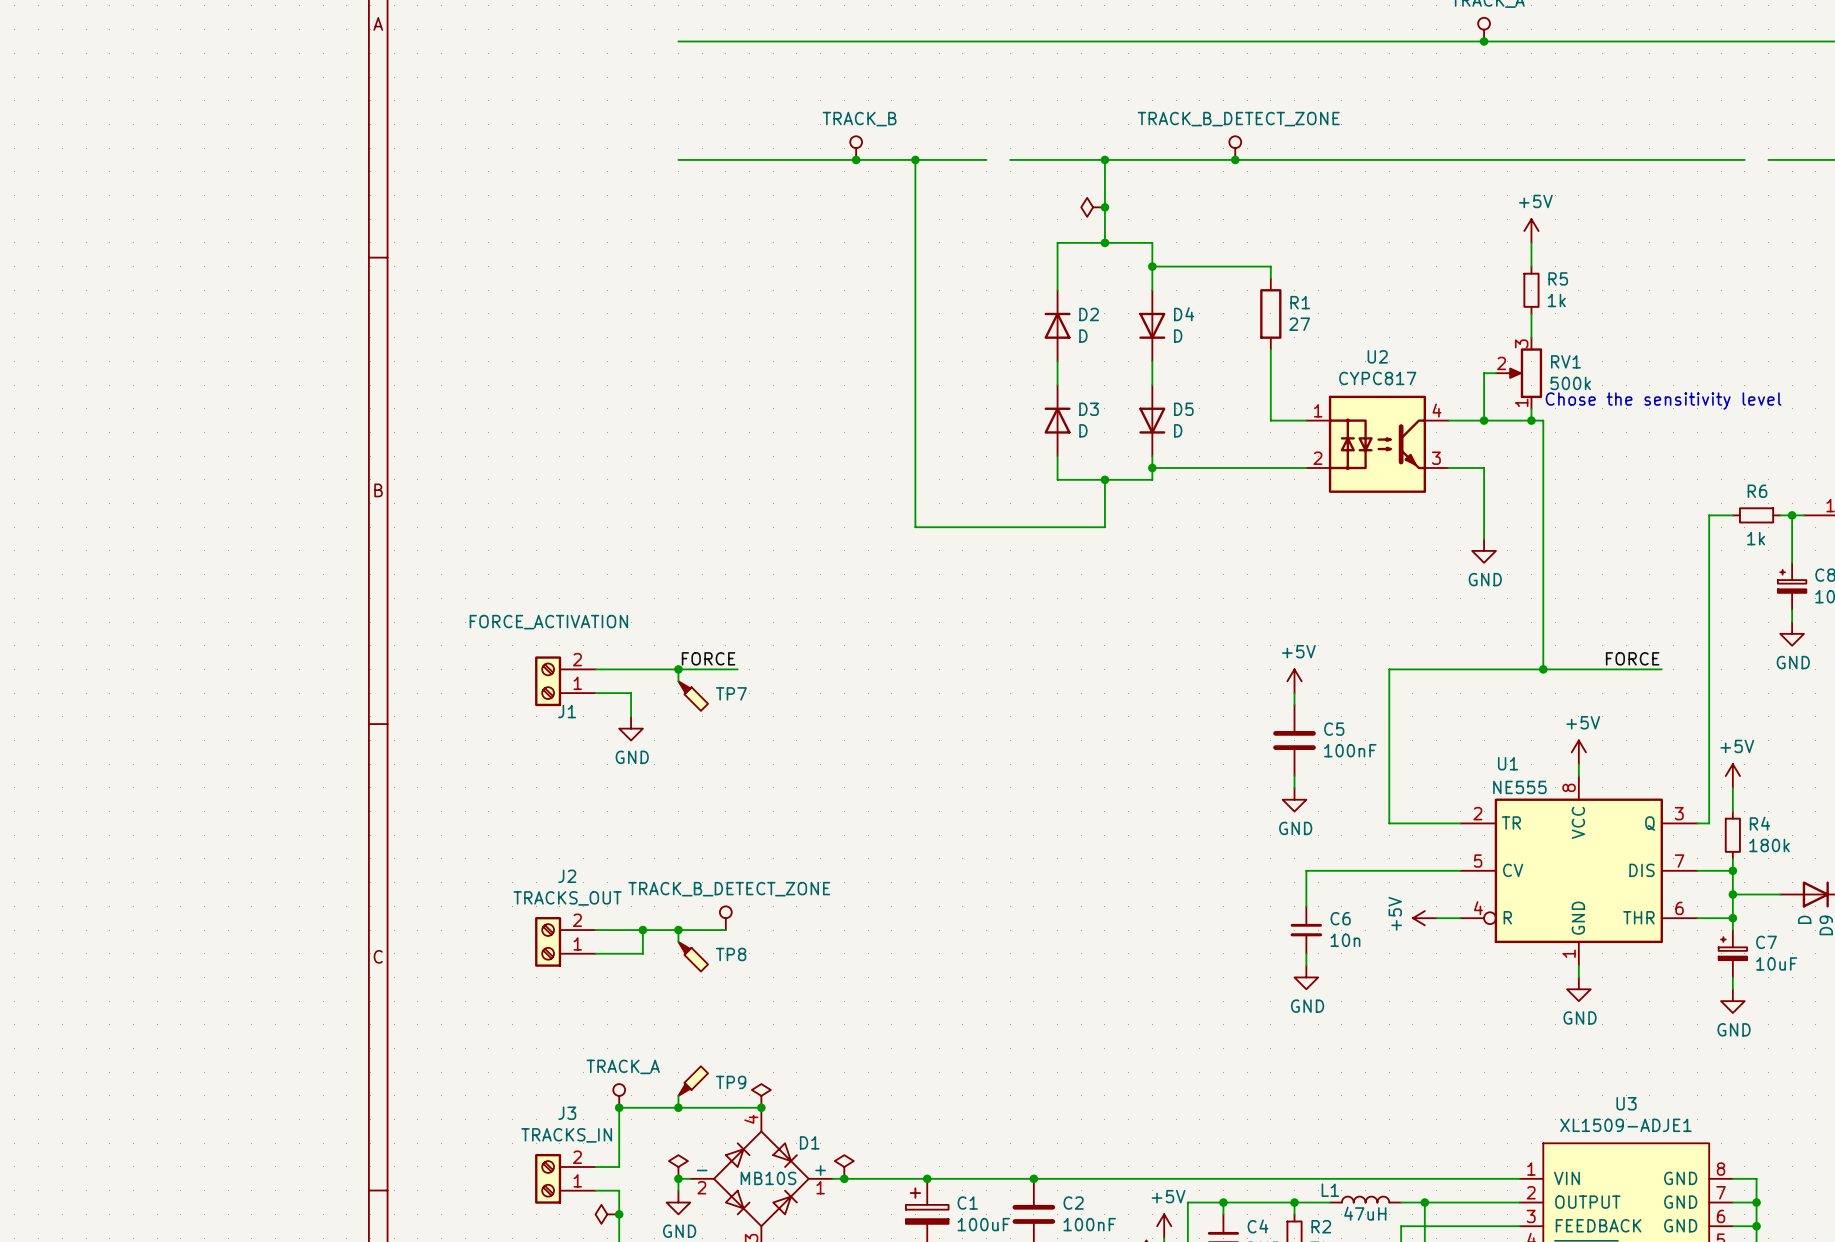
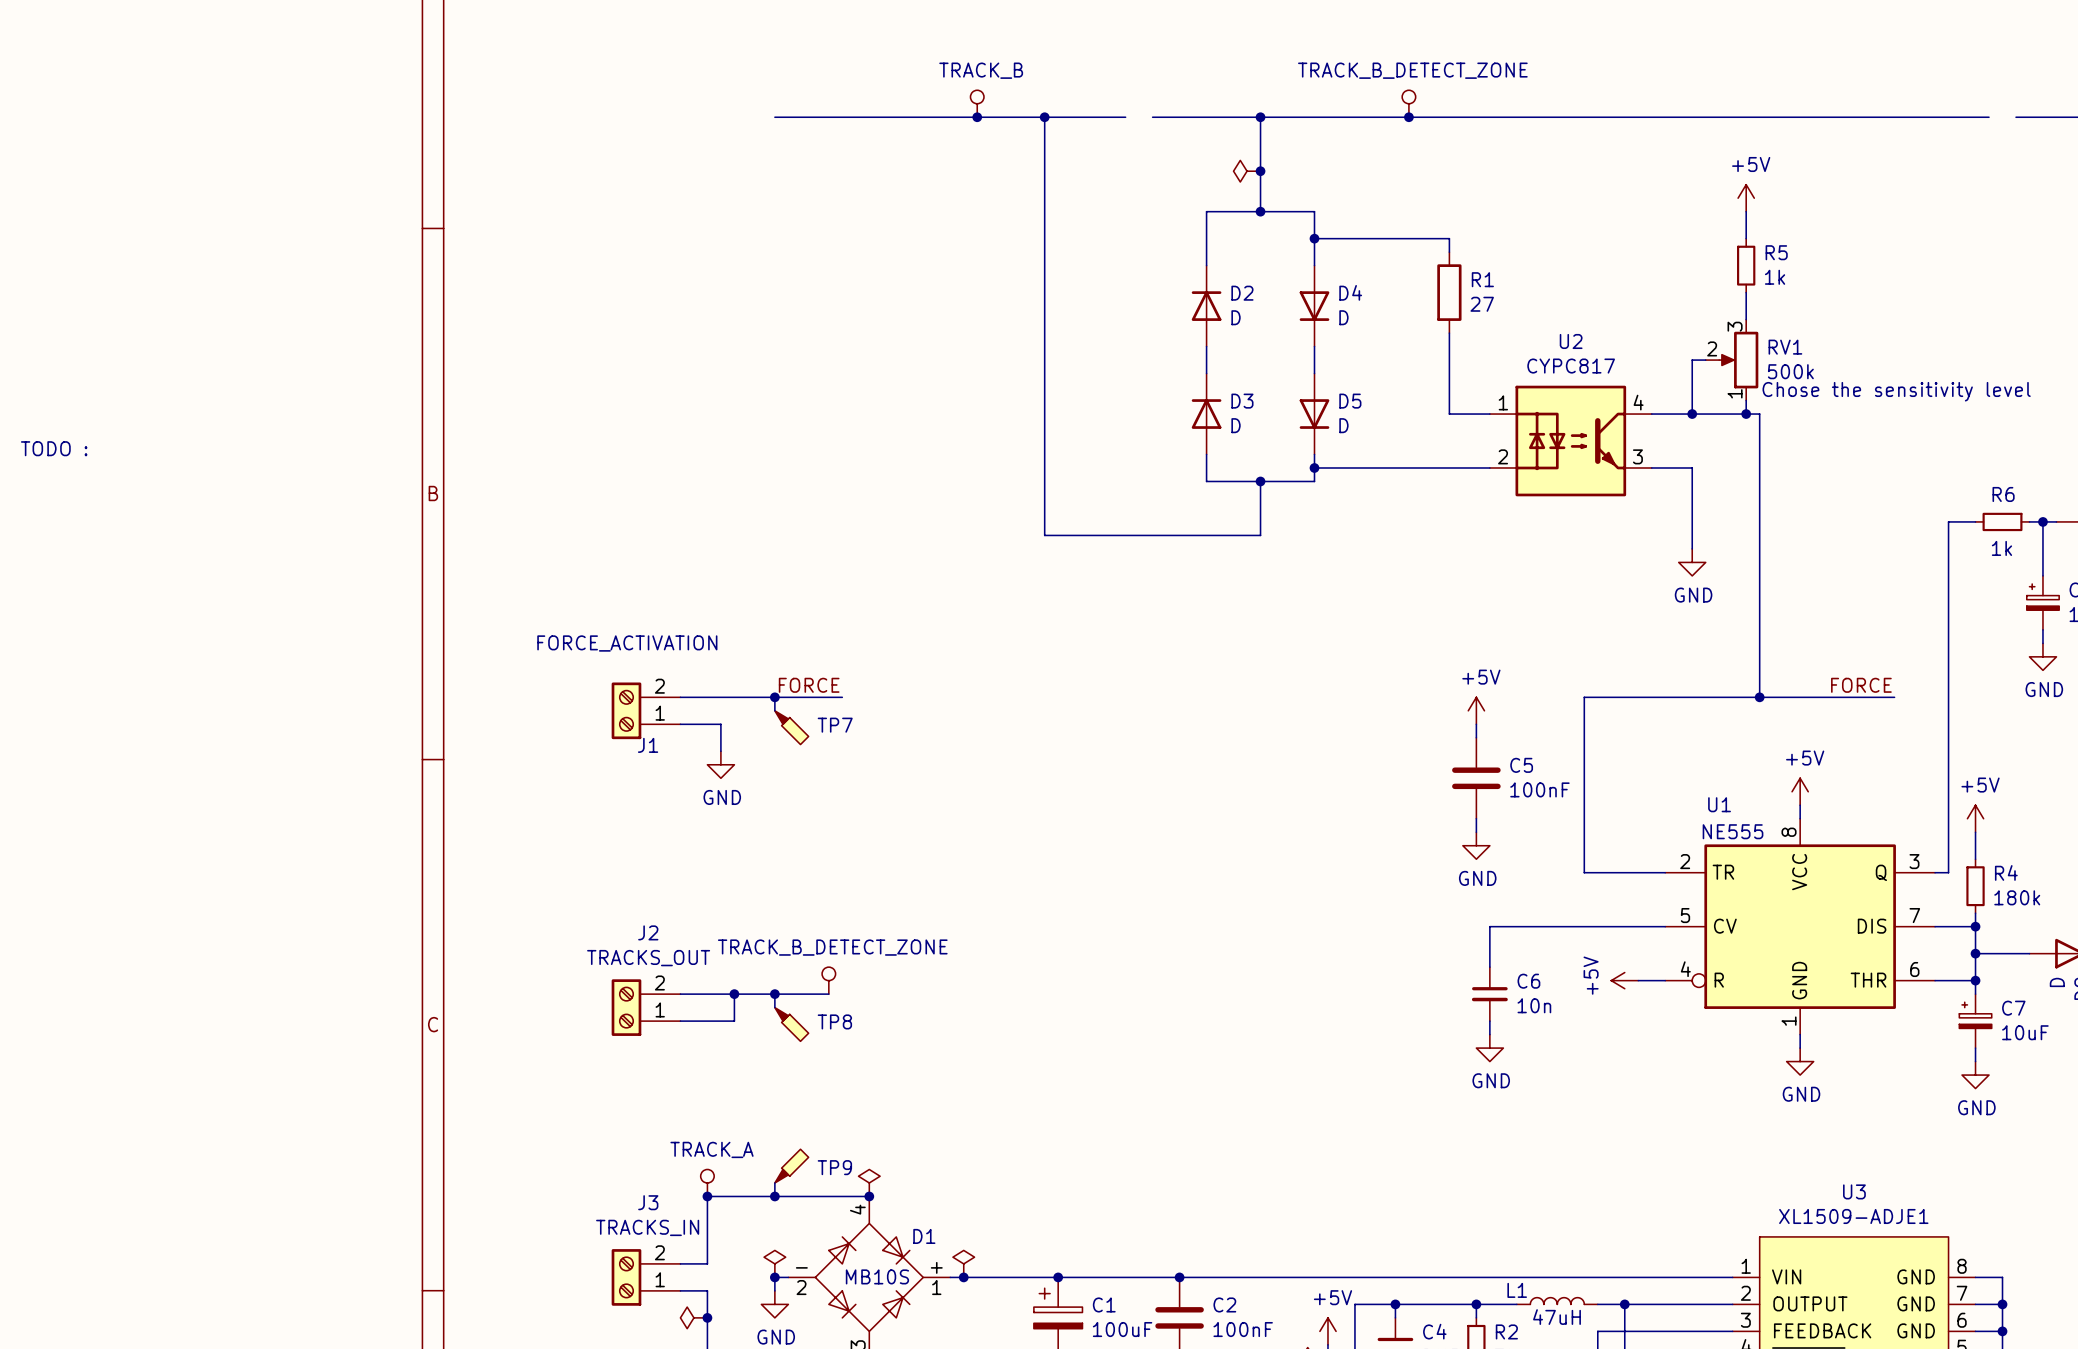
text: none -> TODO : (54, 448)

